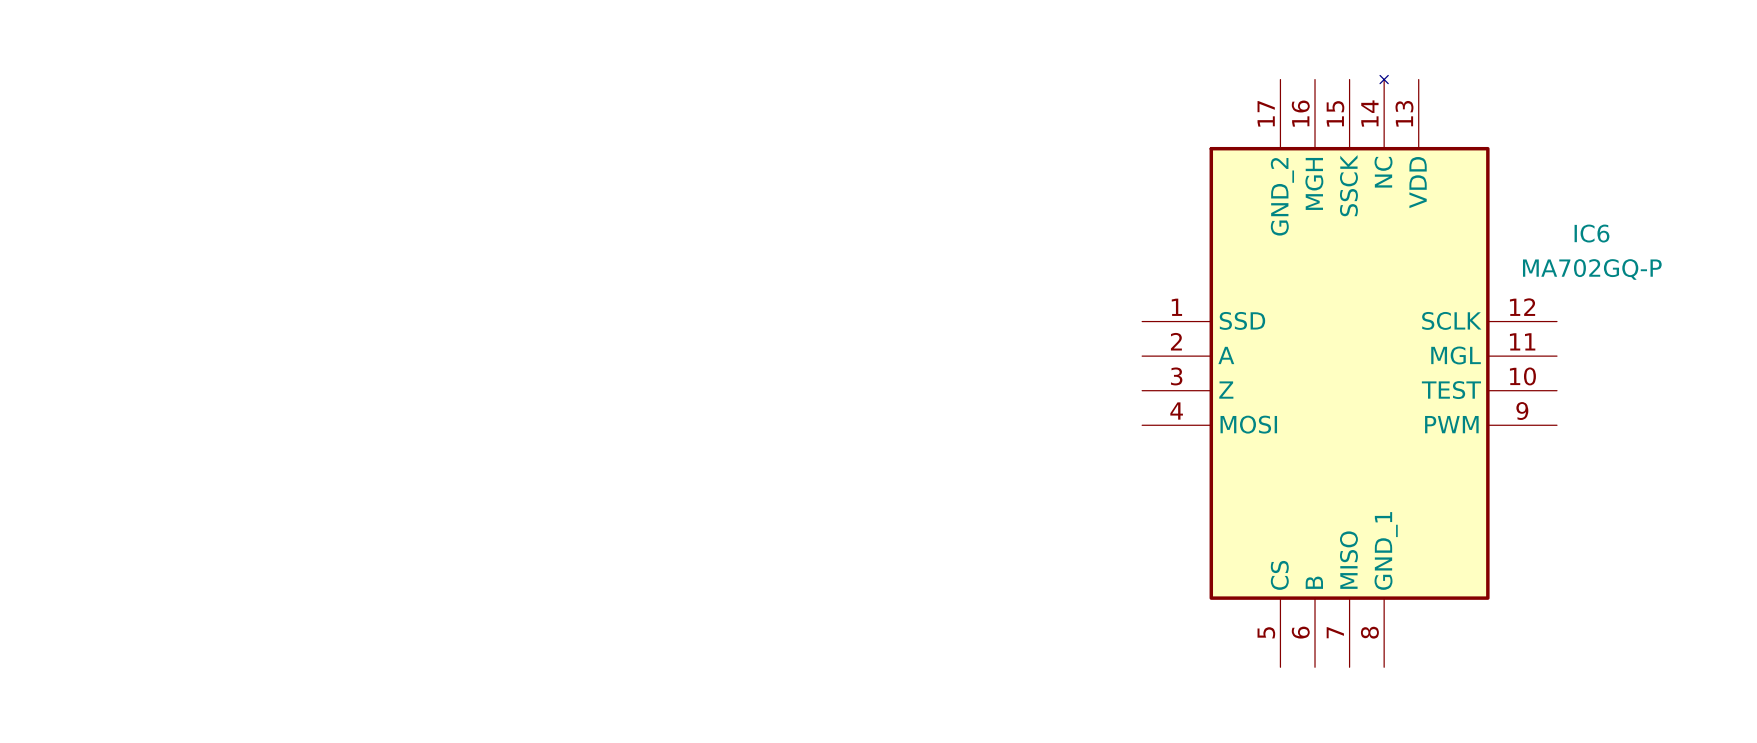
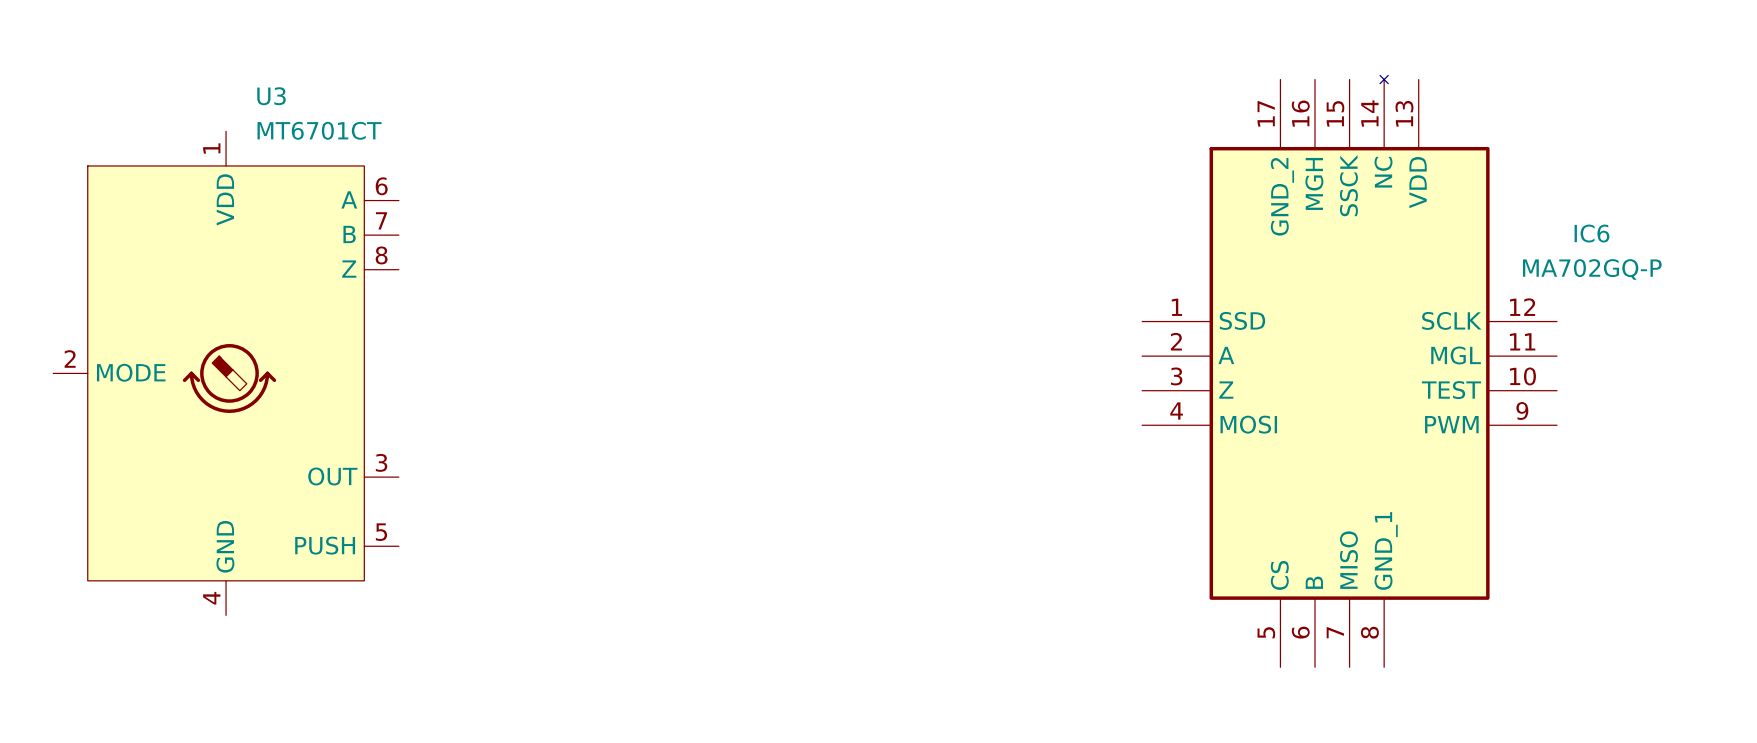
U3: none -> MT6701CT (226, 373)

